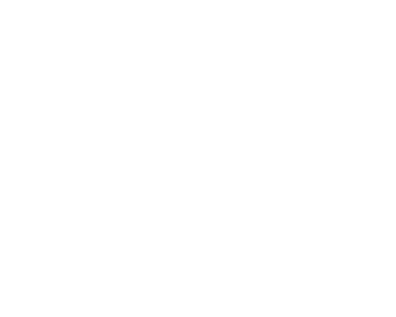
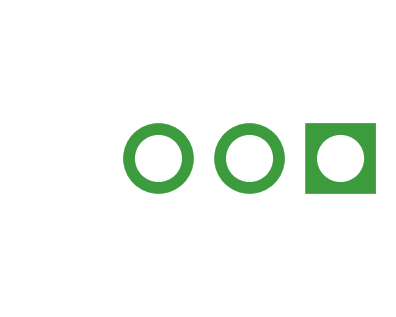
part: none -> (249, 158)

